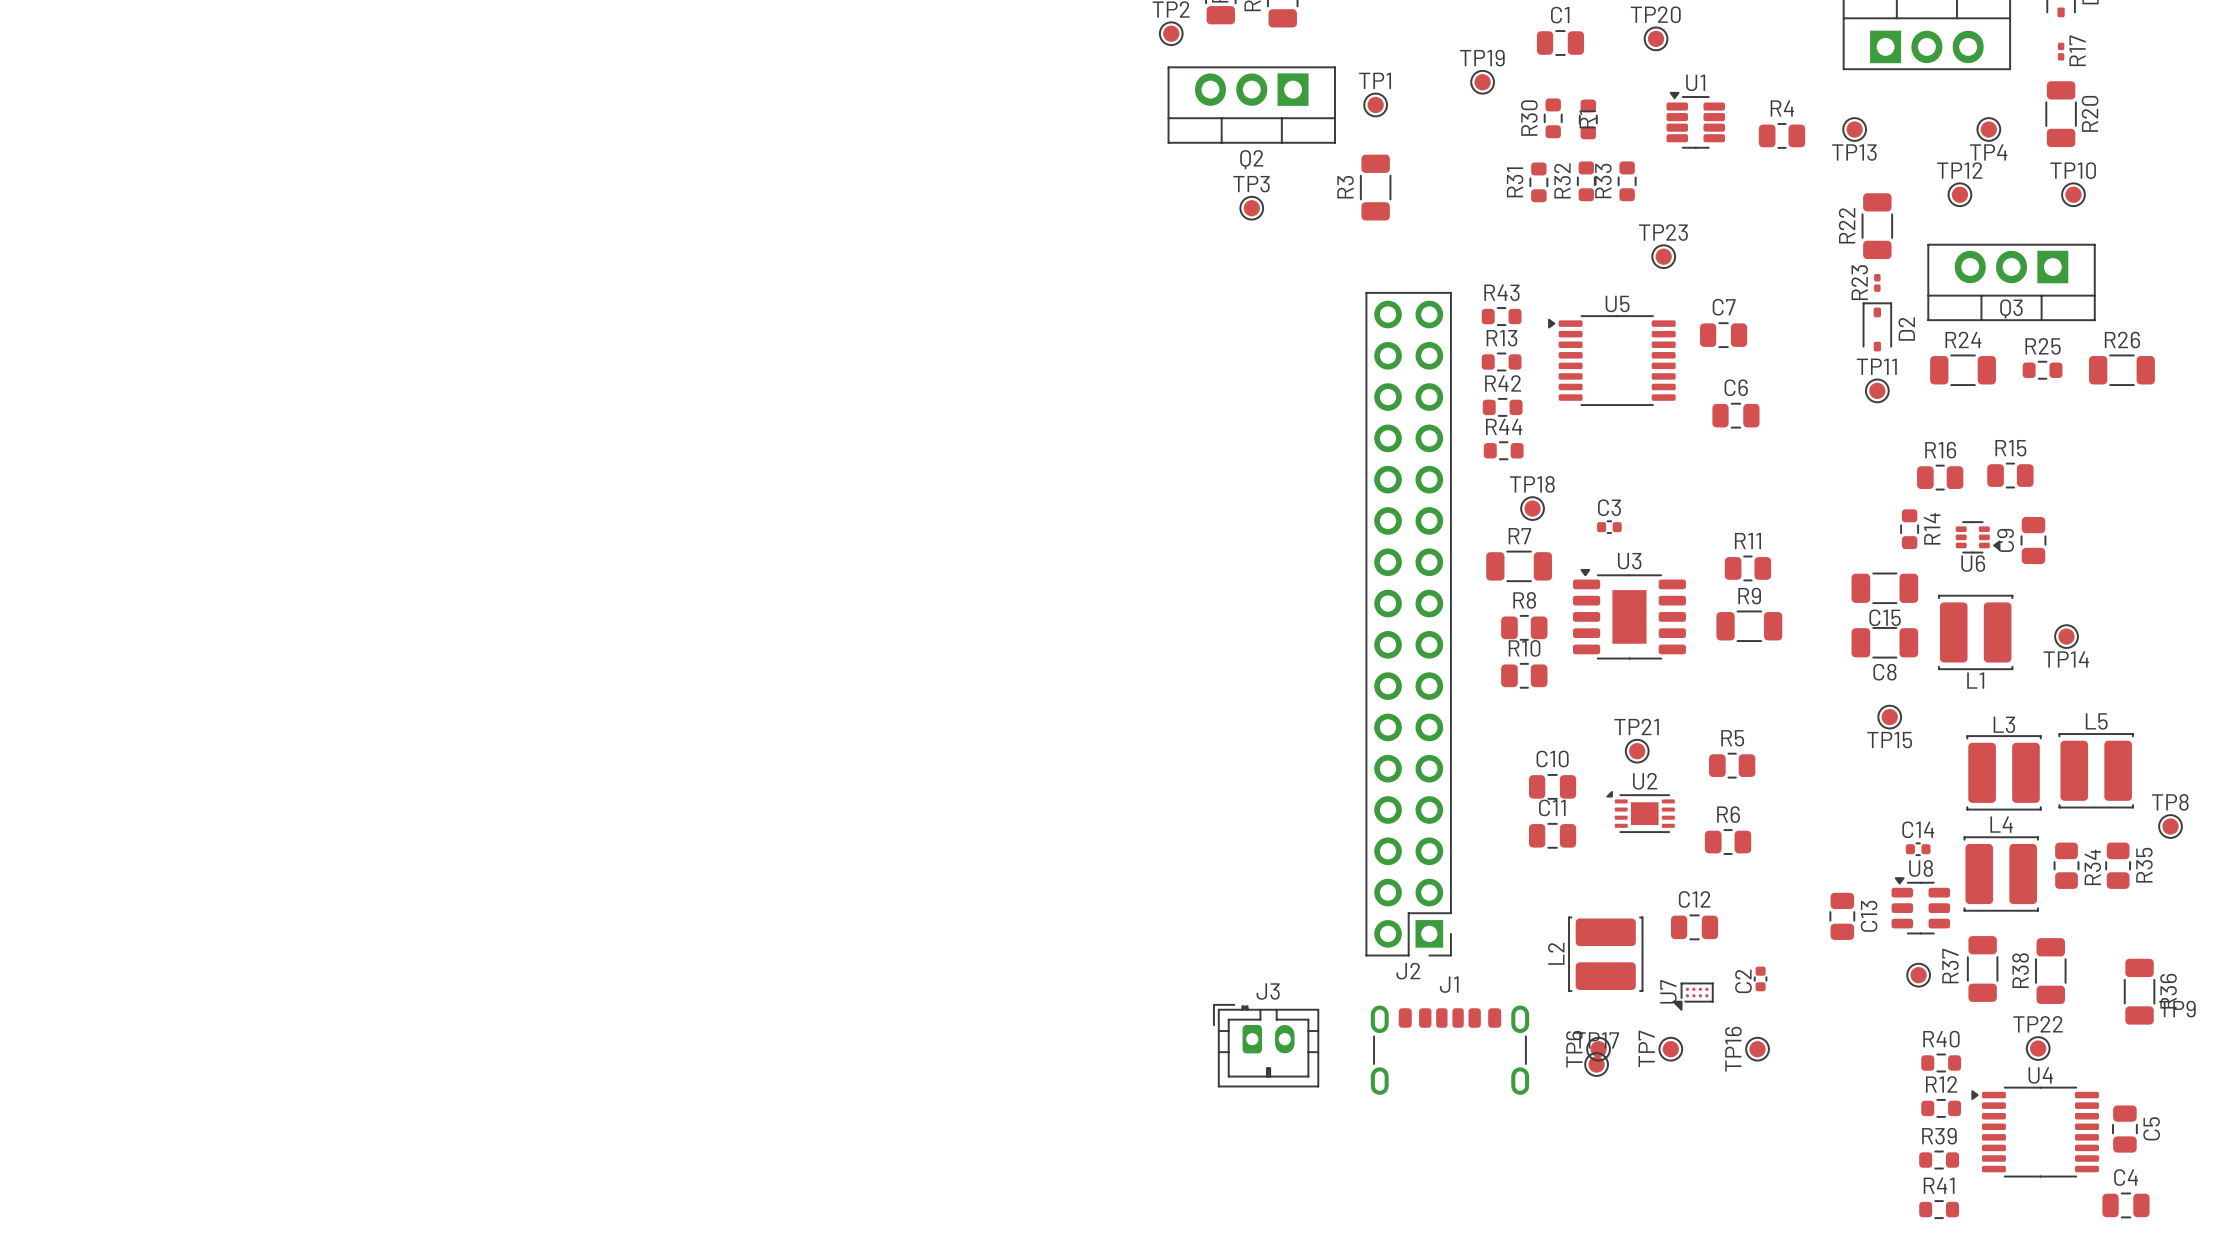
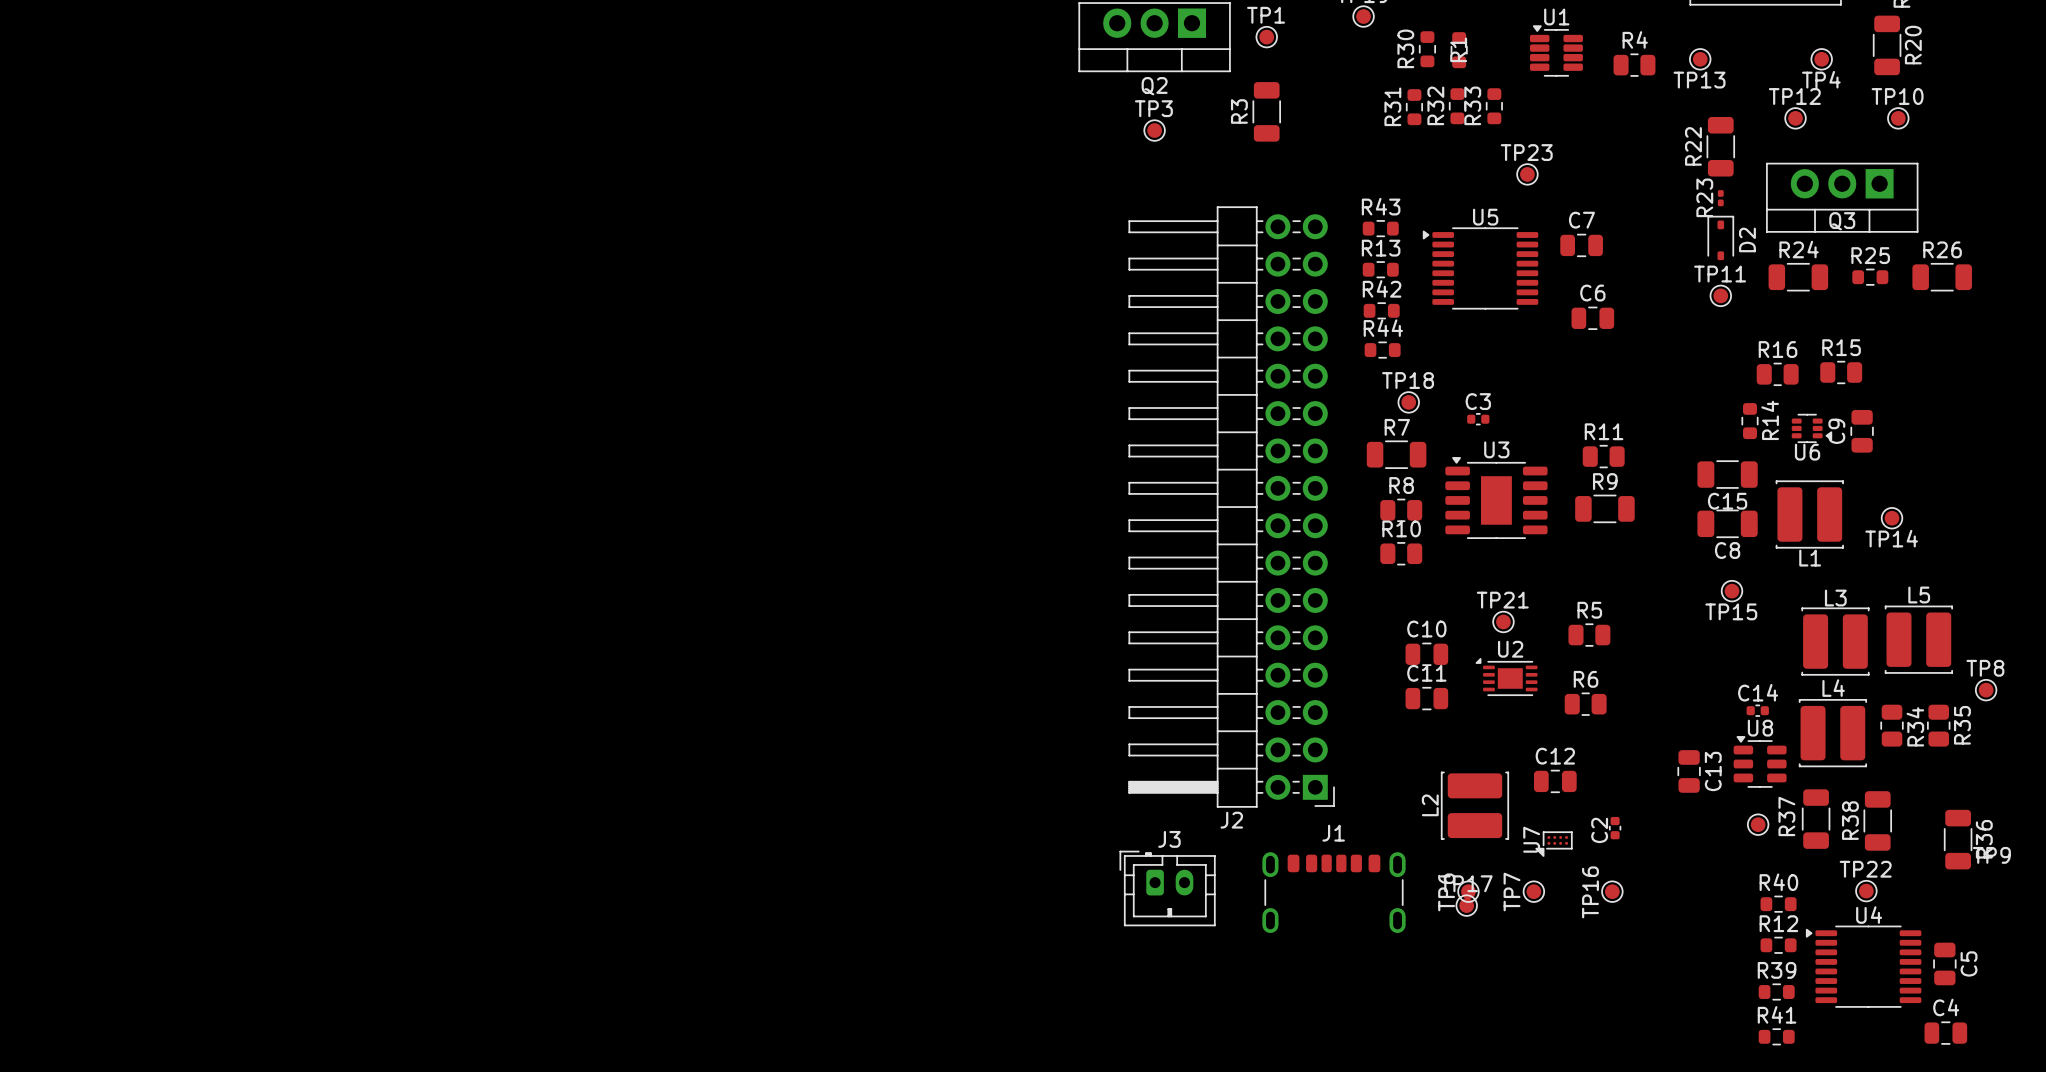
J2 footprint: [1365, 291, 1452, 957] -> [1128, 206, 1335, 808]

